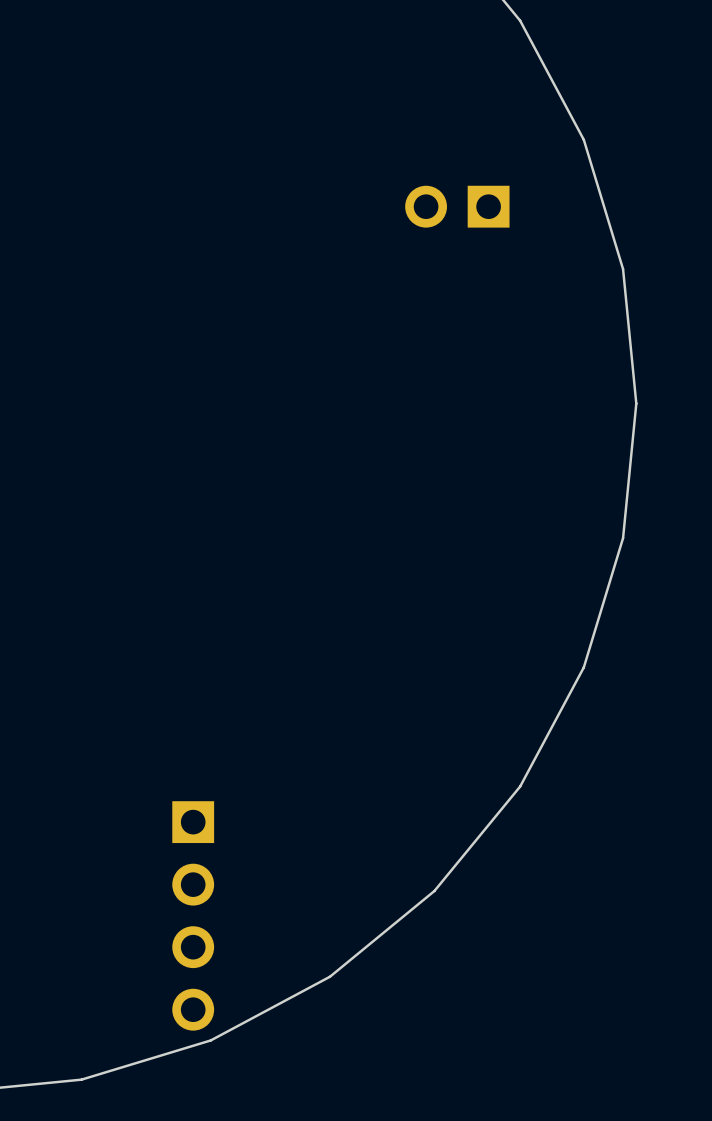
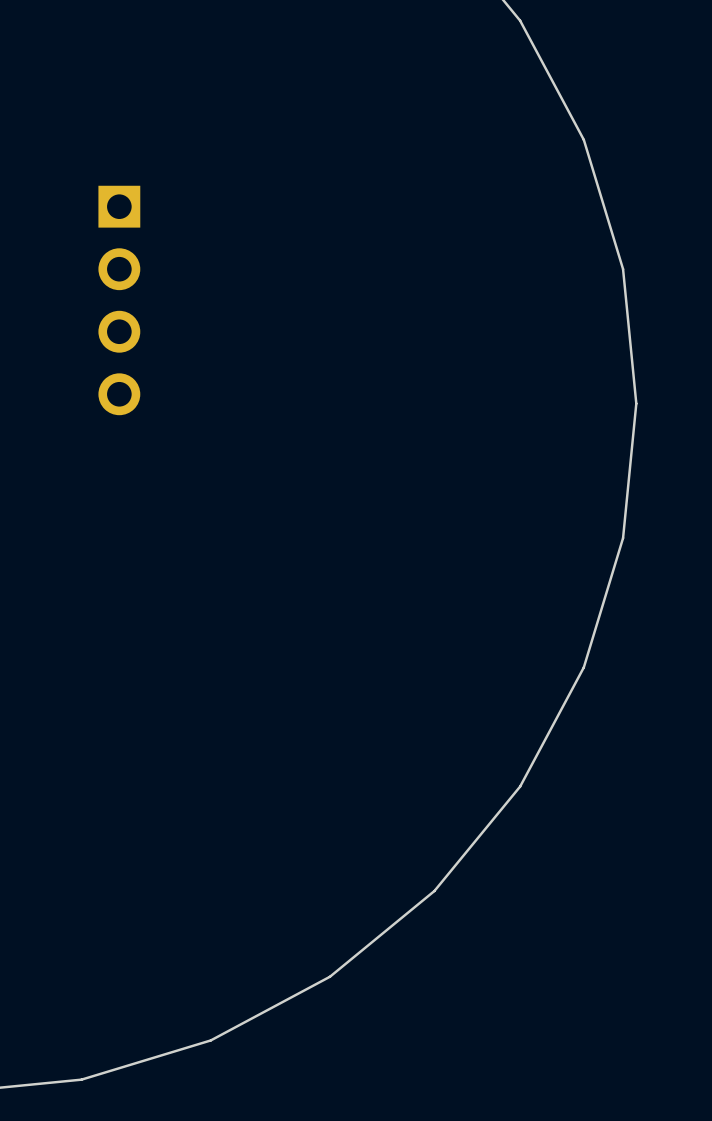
part: (457, 206) -> none
part: none -> (119, 300)
part: (193, 915) -> none

